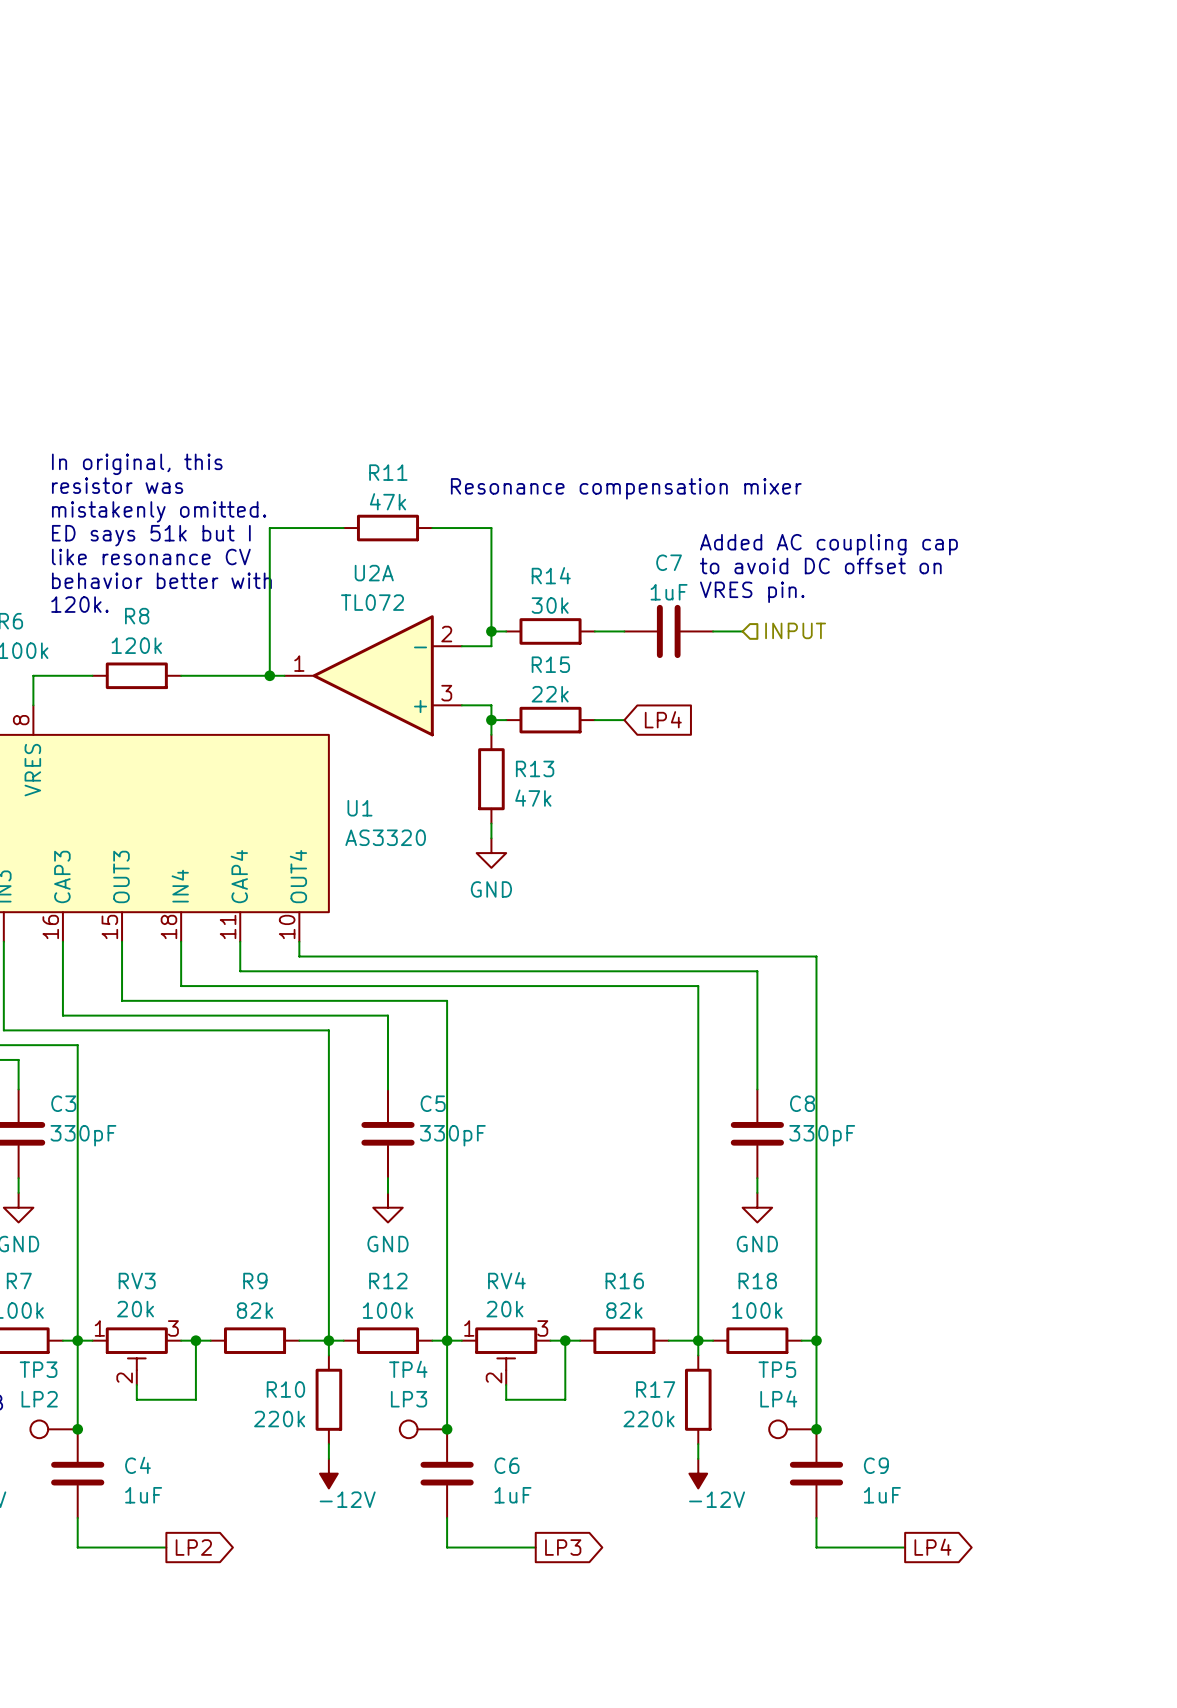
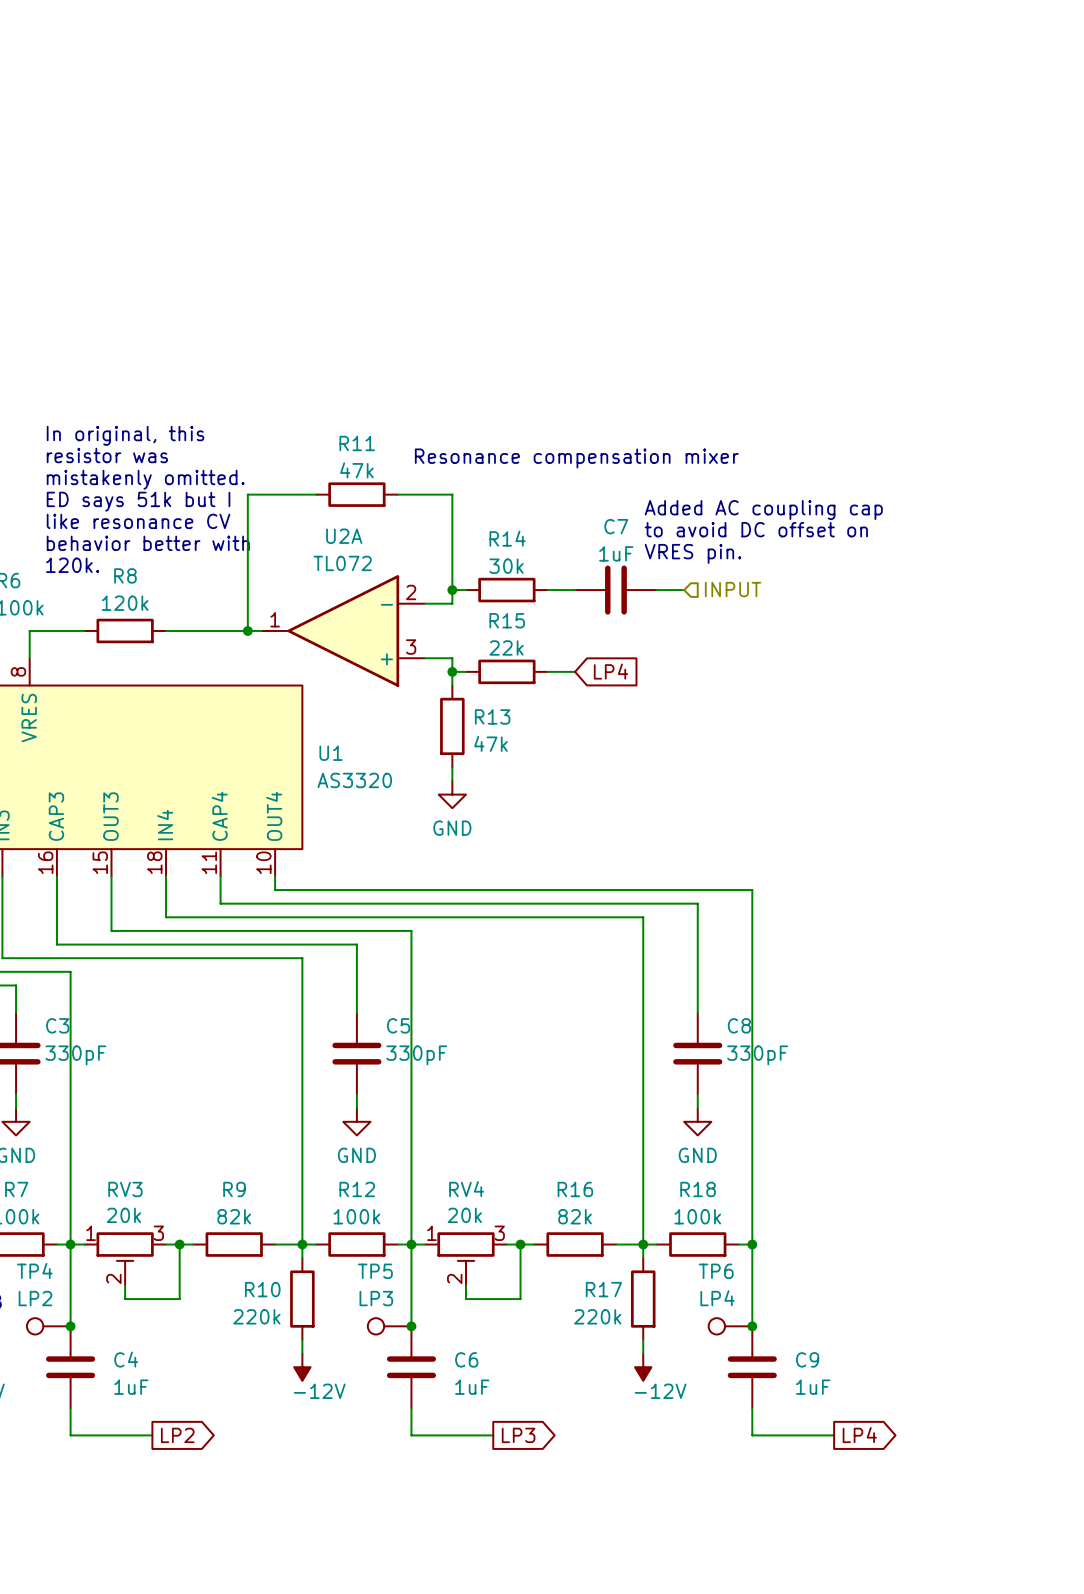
TP3 name: TP3 (38, 1369) -> TP4 (34, 1270)
TP4 name: TP4 (408, 1369) -> TP5 (375, 1271)
TP5 name: TP5 (777, 1369) -> TP6 (716, 1271)

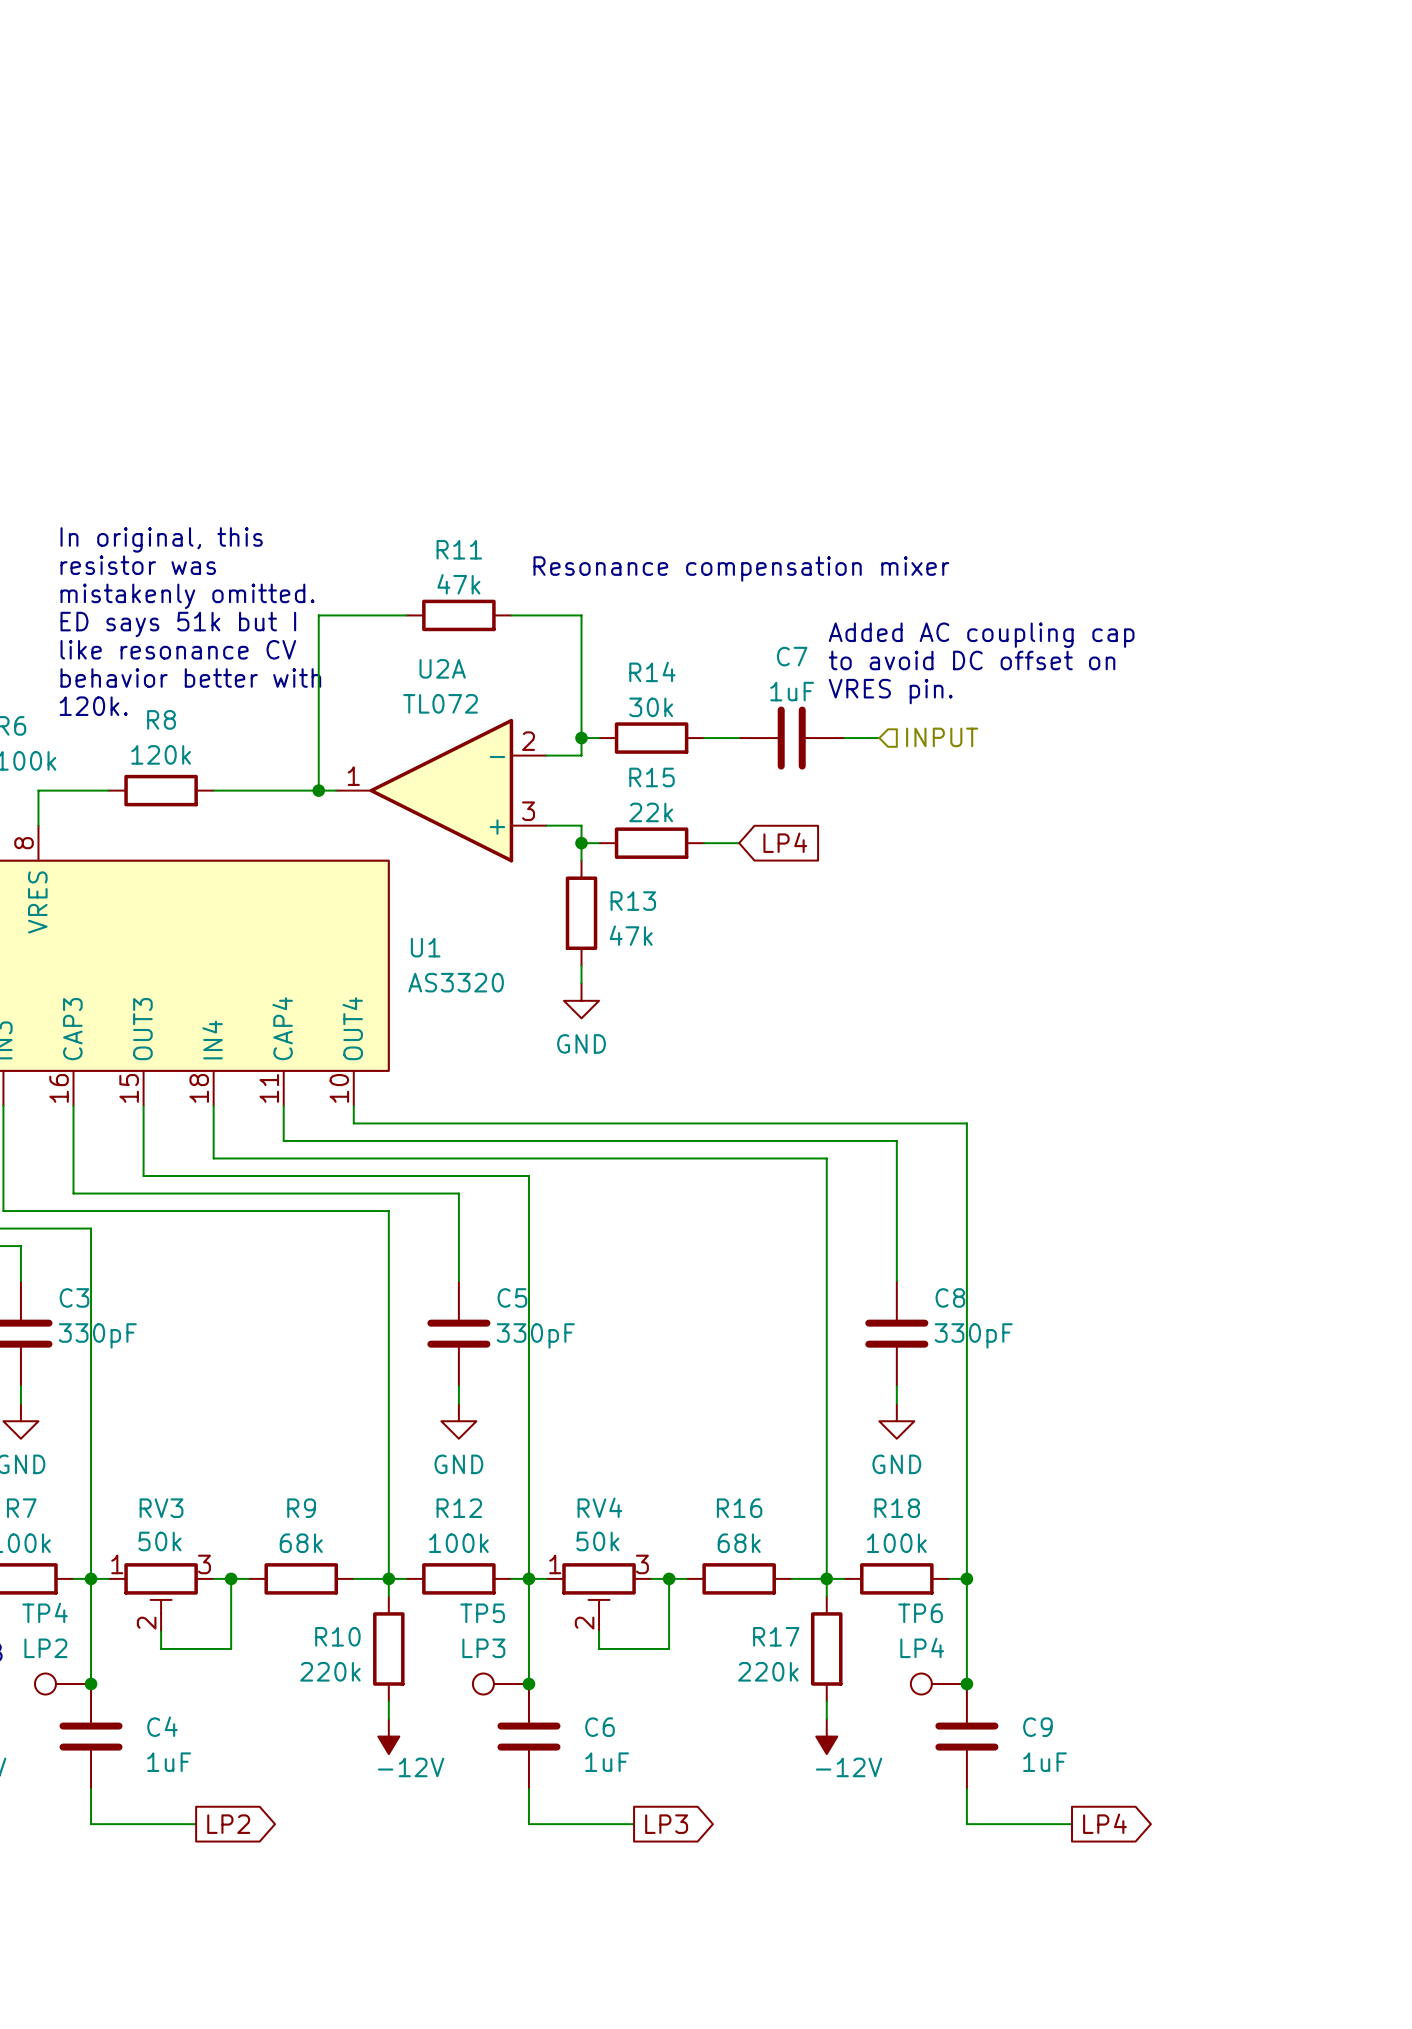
RV3 value: 20k (123, 1215) -> 50k (159, 1541)
RV4 value: 20k (464, 1215) -> 50k (597, 1541)
R9 value: 82k (234, 1216) -> 68k (301, 1543)
R16 value: 82k (575, 1216) -> 68k (739, 1543)

